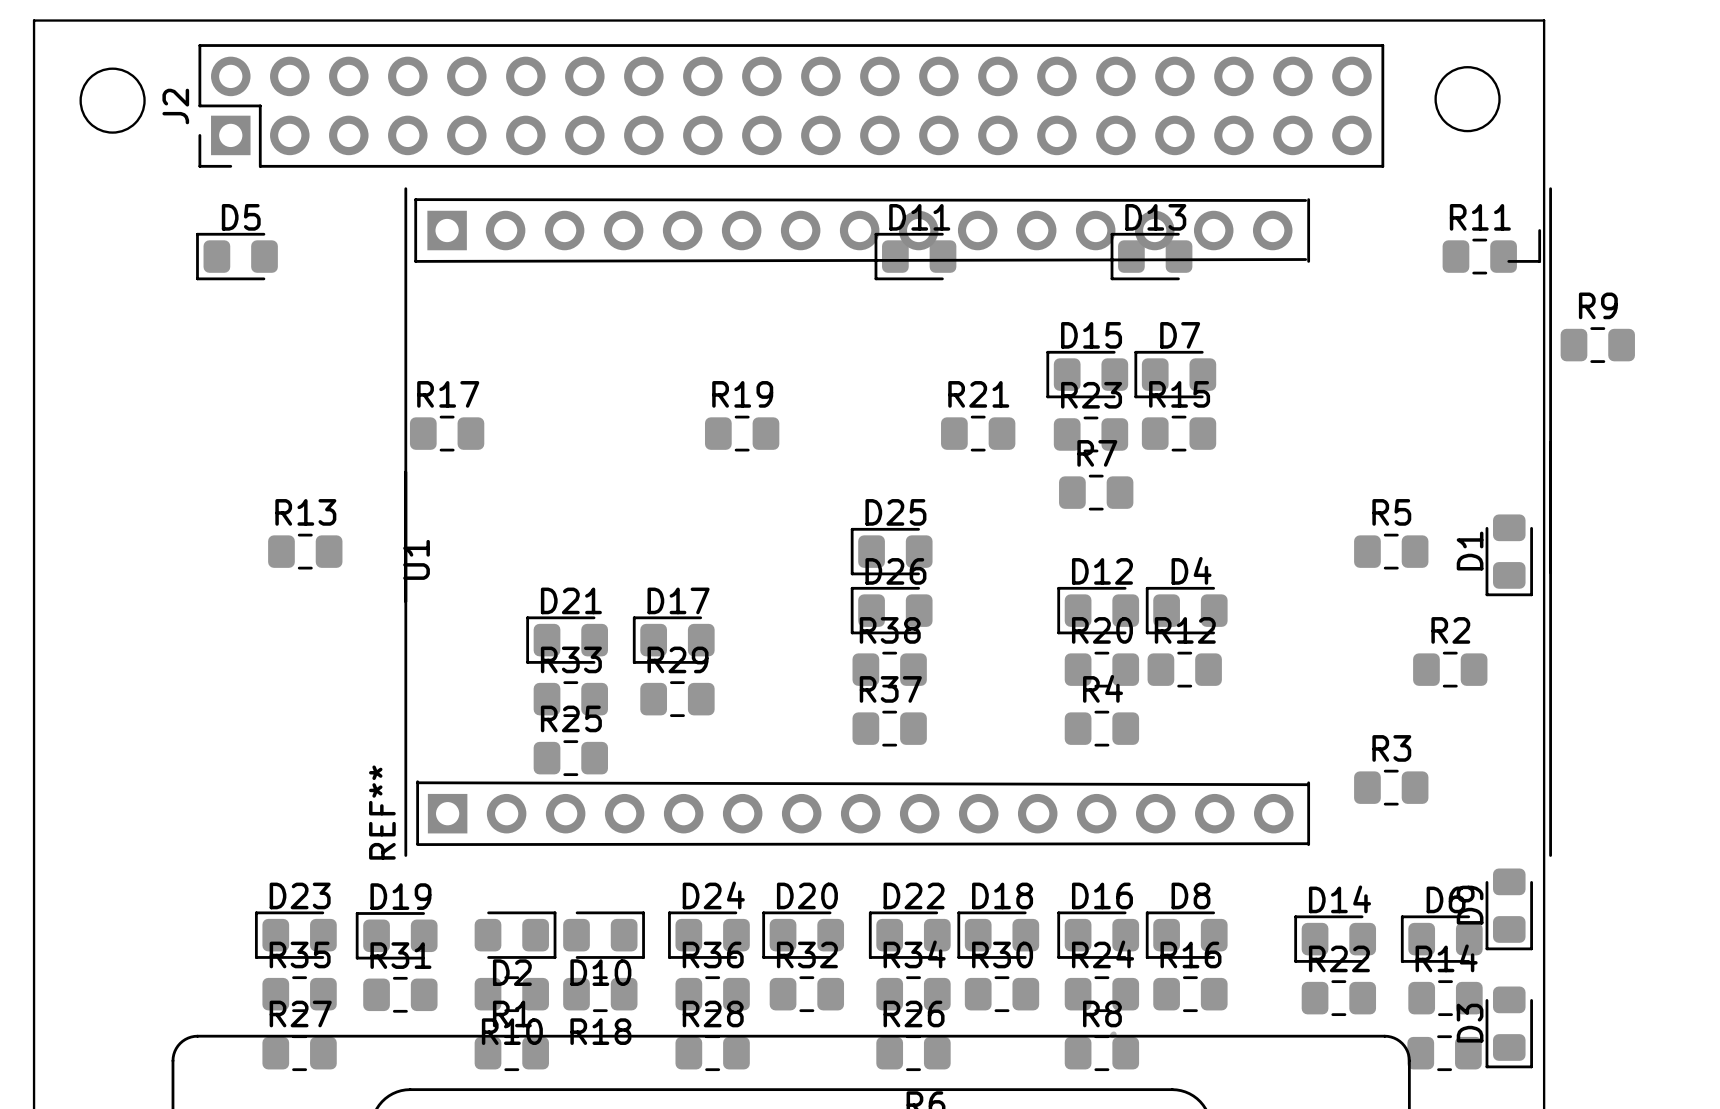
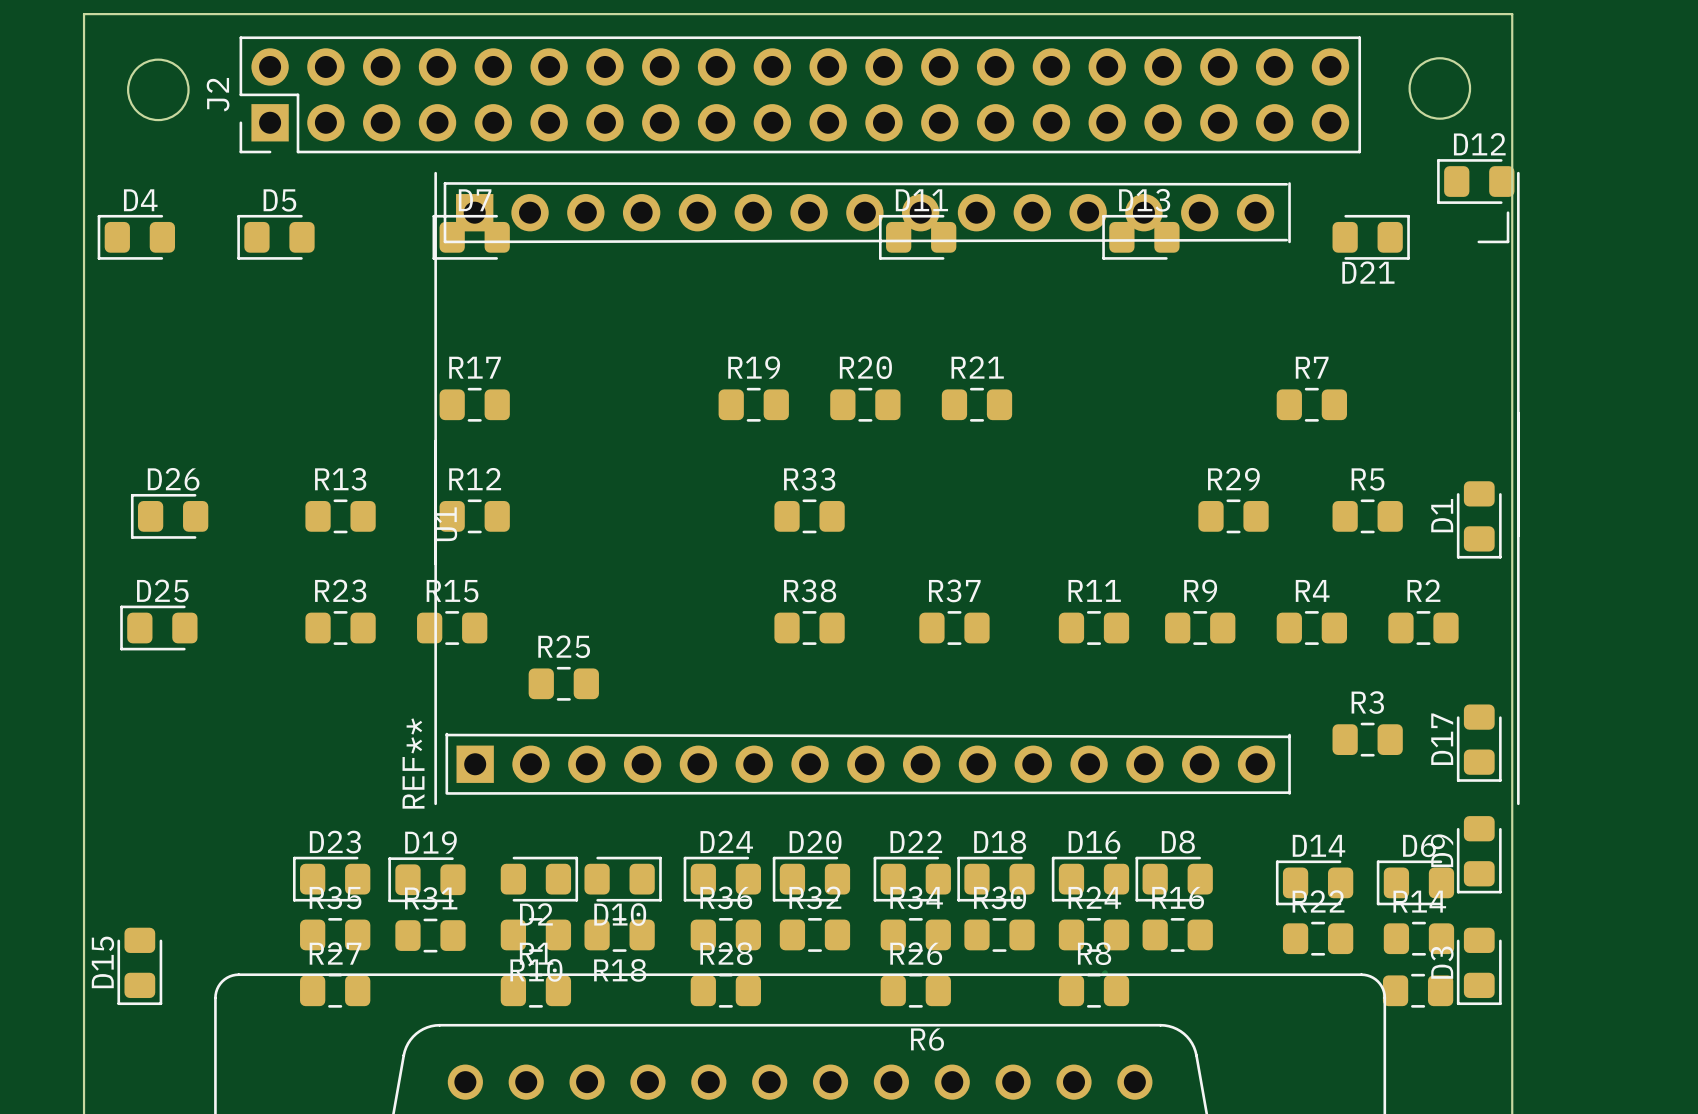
R11: (1479, 256) -> none
R9 position: (1597, 345) -> (1200, 628)
D15 rotation: 0° (1087, 374) -> 90° counterclockwise (139, 966)
D15 position: (1087, 374) -> (139, 966)
D7 position: (1175, 374) -> (471, 237)
R20: none -> (865, 404)
R15 position: (1179, 433) -> (452, 628)
R23 position: (1090, 434) -> (340, 628)
R7 position: (1096, 492) -> (1311, 404)
D25 position: (891, 551) -> (158, 628)
D26 position: (891, 610) -> (169, 516)
D12 position: (1098, 610) -> (1475, 181)
D4 position: (1186, 610) -> (136, 237)
R20 name: R20 (1102, 630) -> R11 (1094, 590)
D21 rotation: 0° (567, 640) -> 180° (1371, 237)
D21 position: (567, 640) -> (1371, 237)
D17 rotation: 0° (673, 640) -> 90° counterclockwise (1479, 743)
D17 position: (673, 640) -> (1479, 743)
R38 position: (889, 669) -> (809, 628)
R12 position: (1184, 669) -> (474, 516)
R33 position: (570, 699) -> (809, 516)
R29 position: (677, 699) -> (1233, 516)
R37 position: (889, 728) -> (954, 628)
R4 position: (1101, 728) -> (1311, 628)
R25 position: (570, 758) -> (563, 683)

